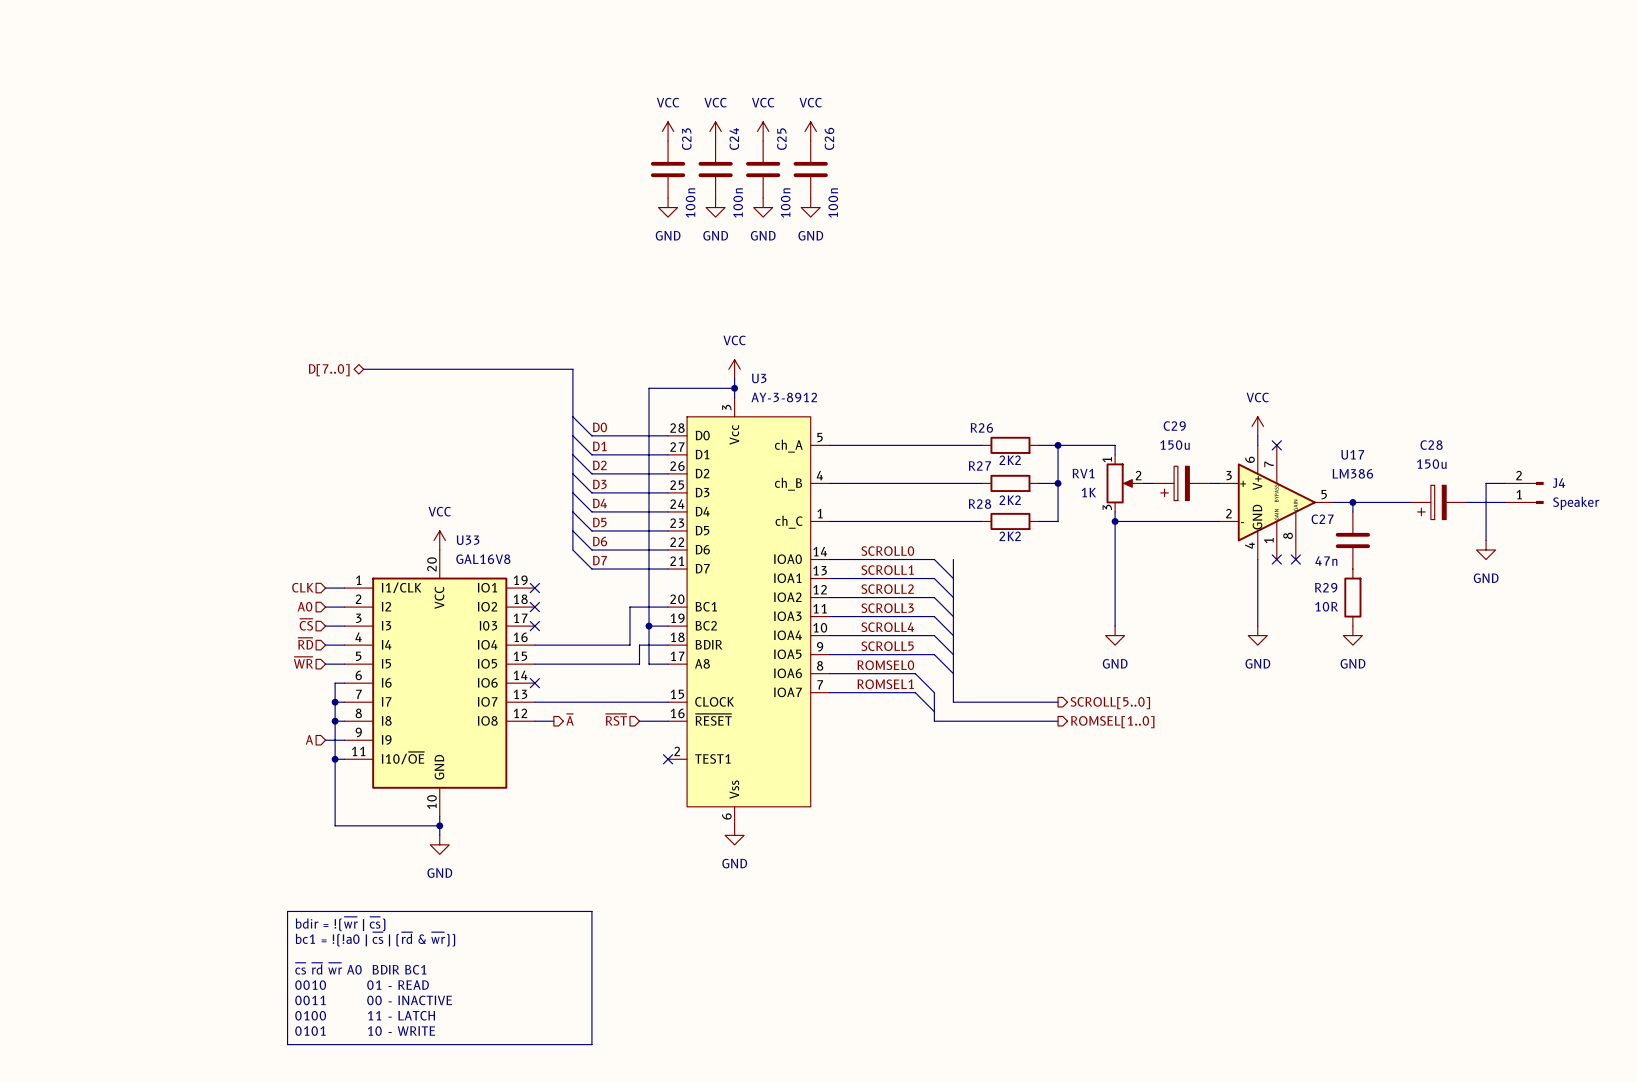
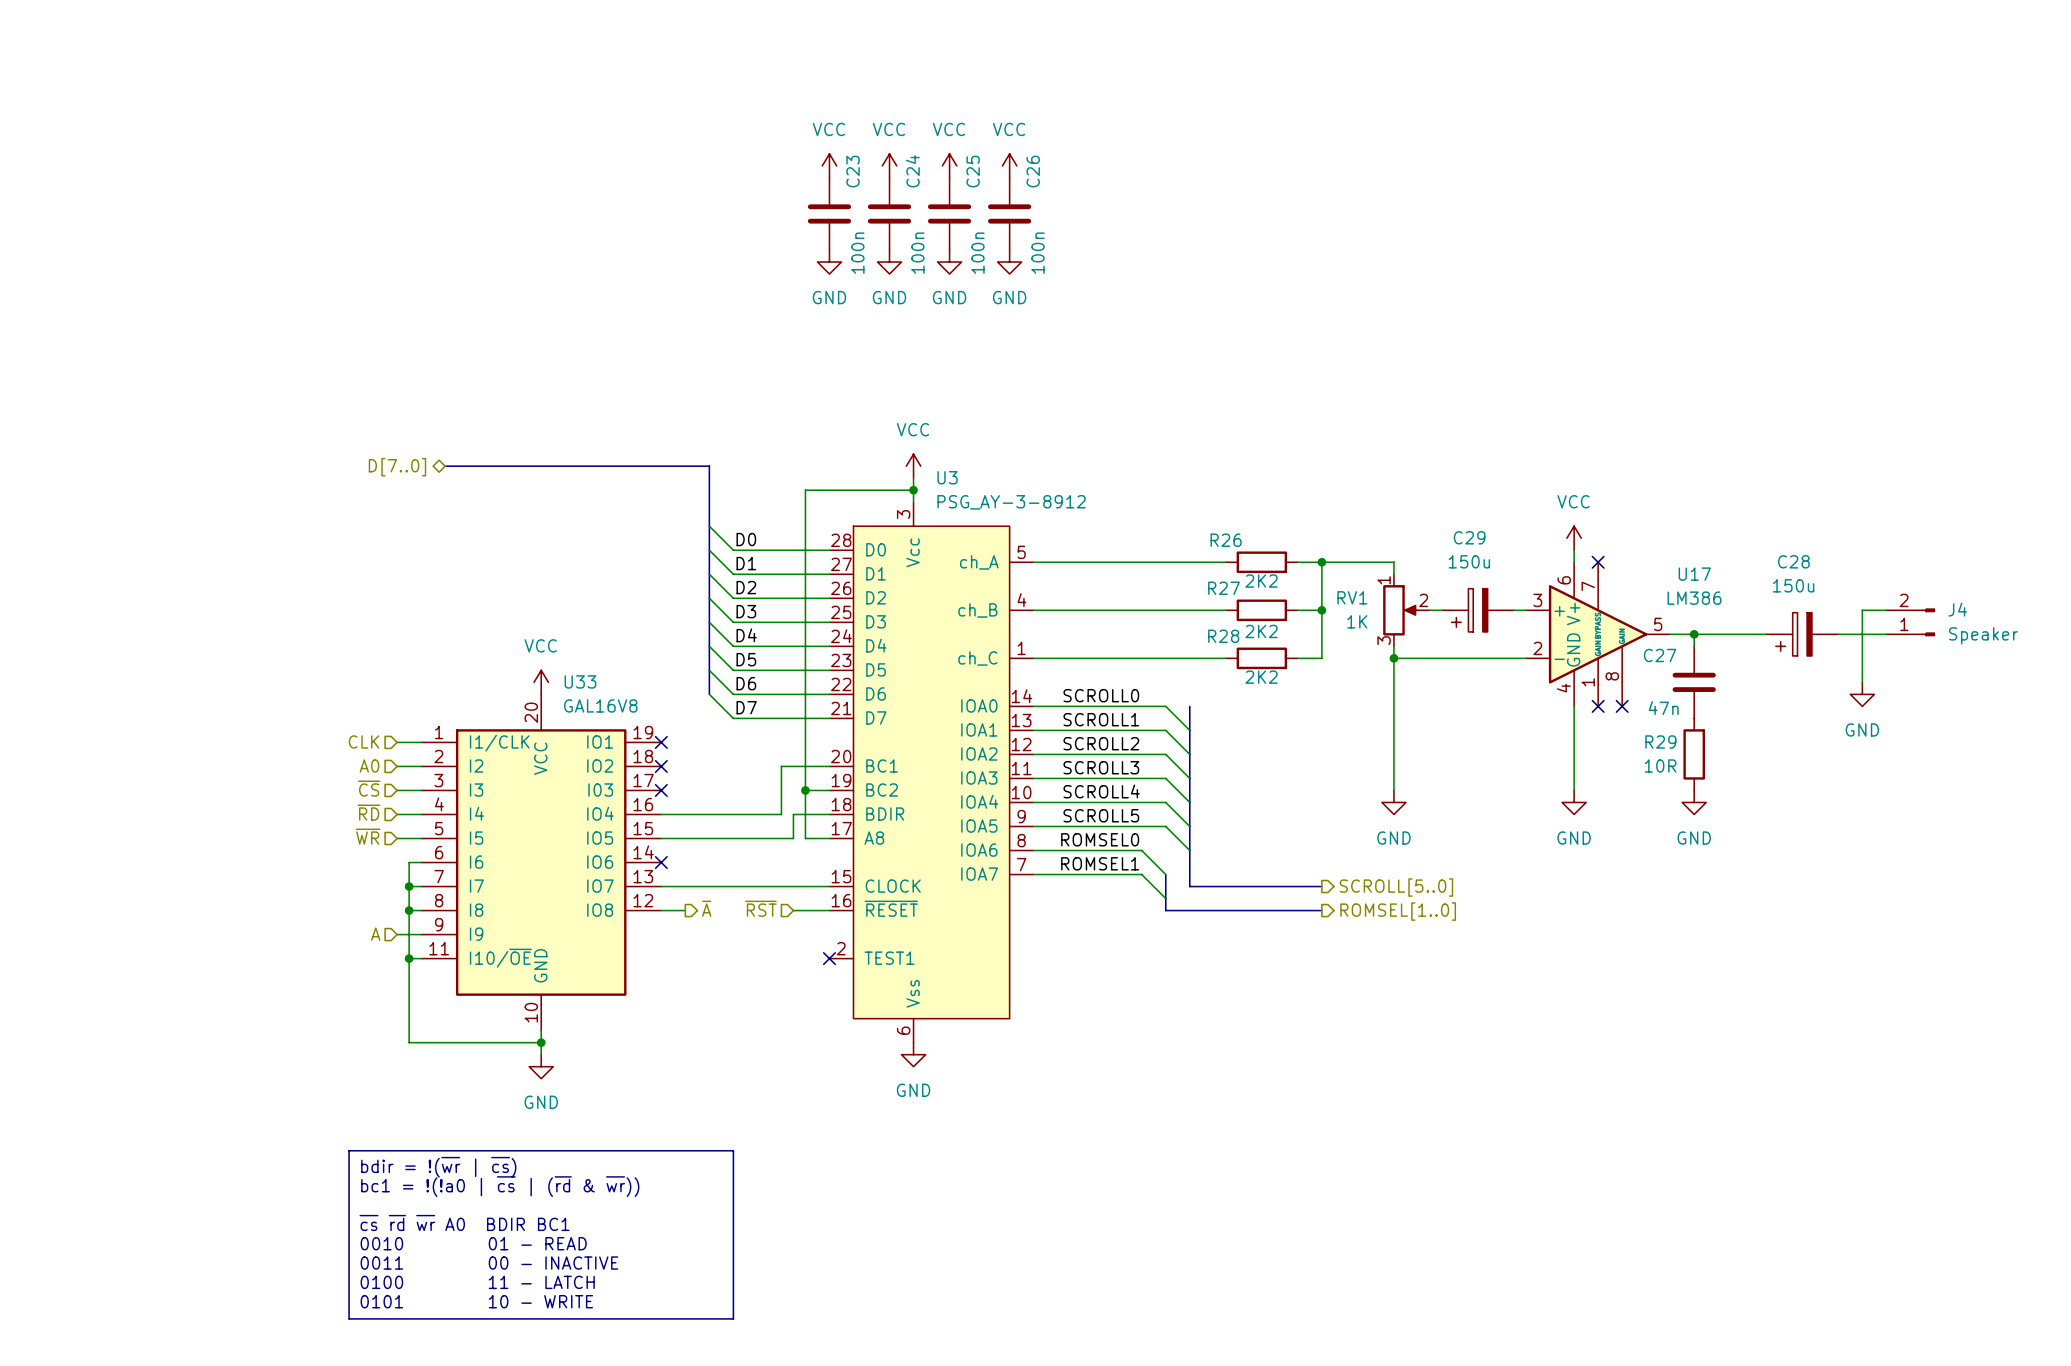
U3 value: AY-3-8912 (784, 397) -> PSG_AY-3-8912 (1011, 502)

